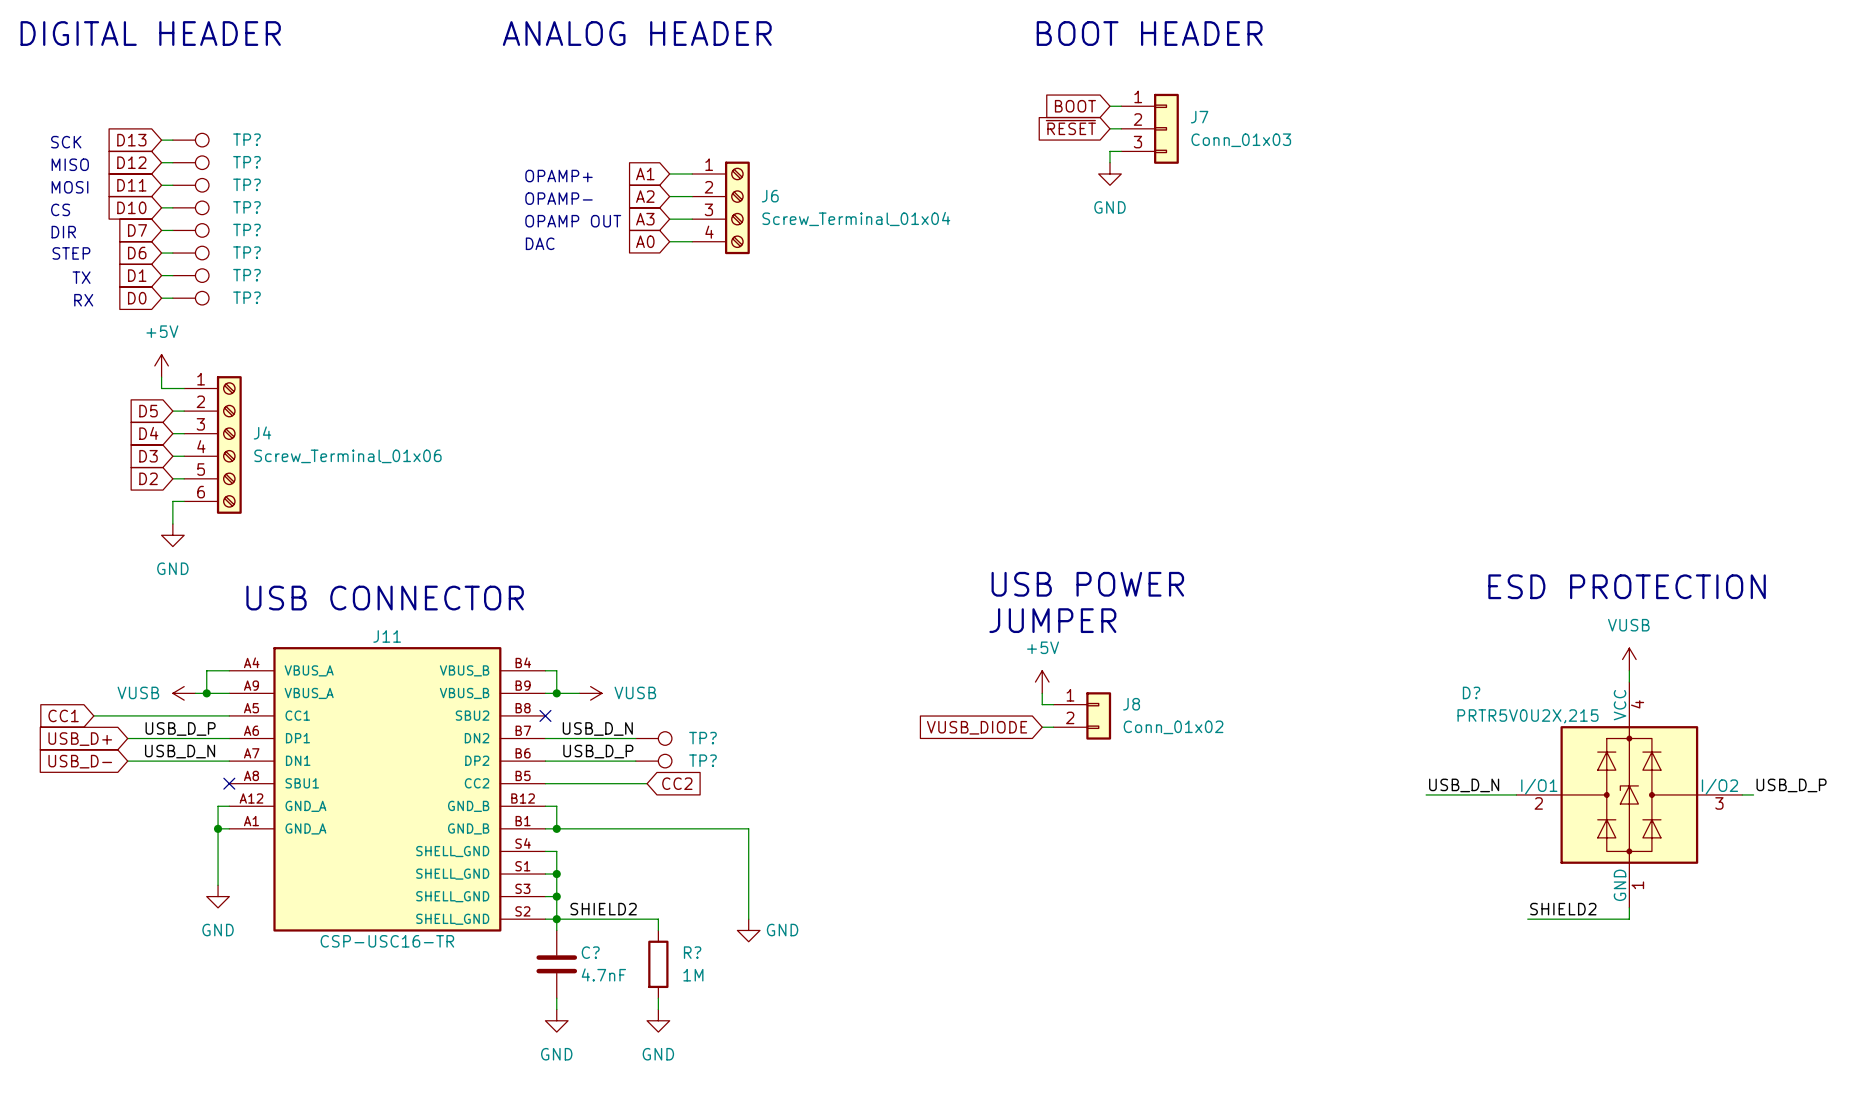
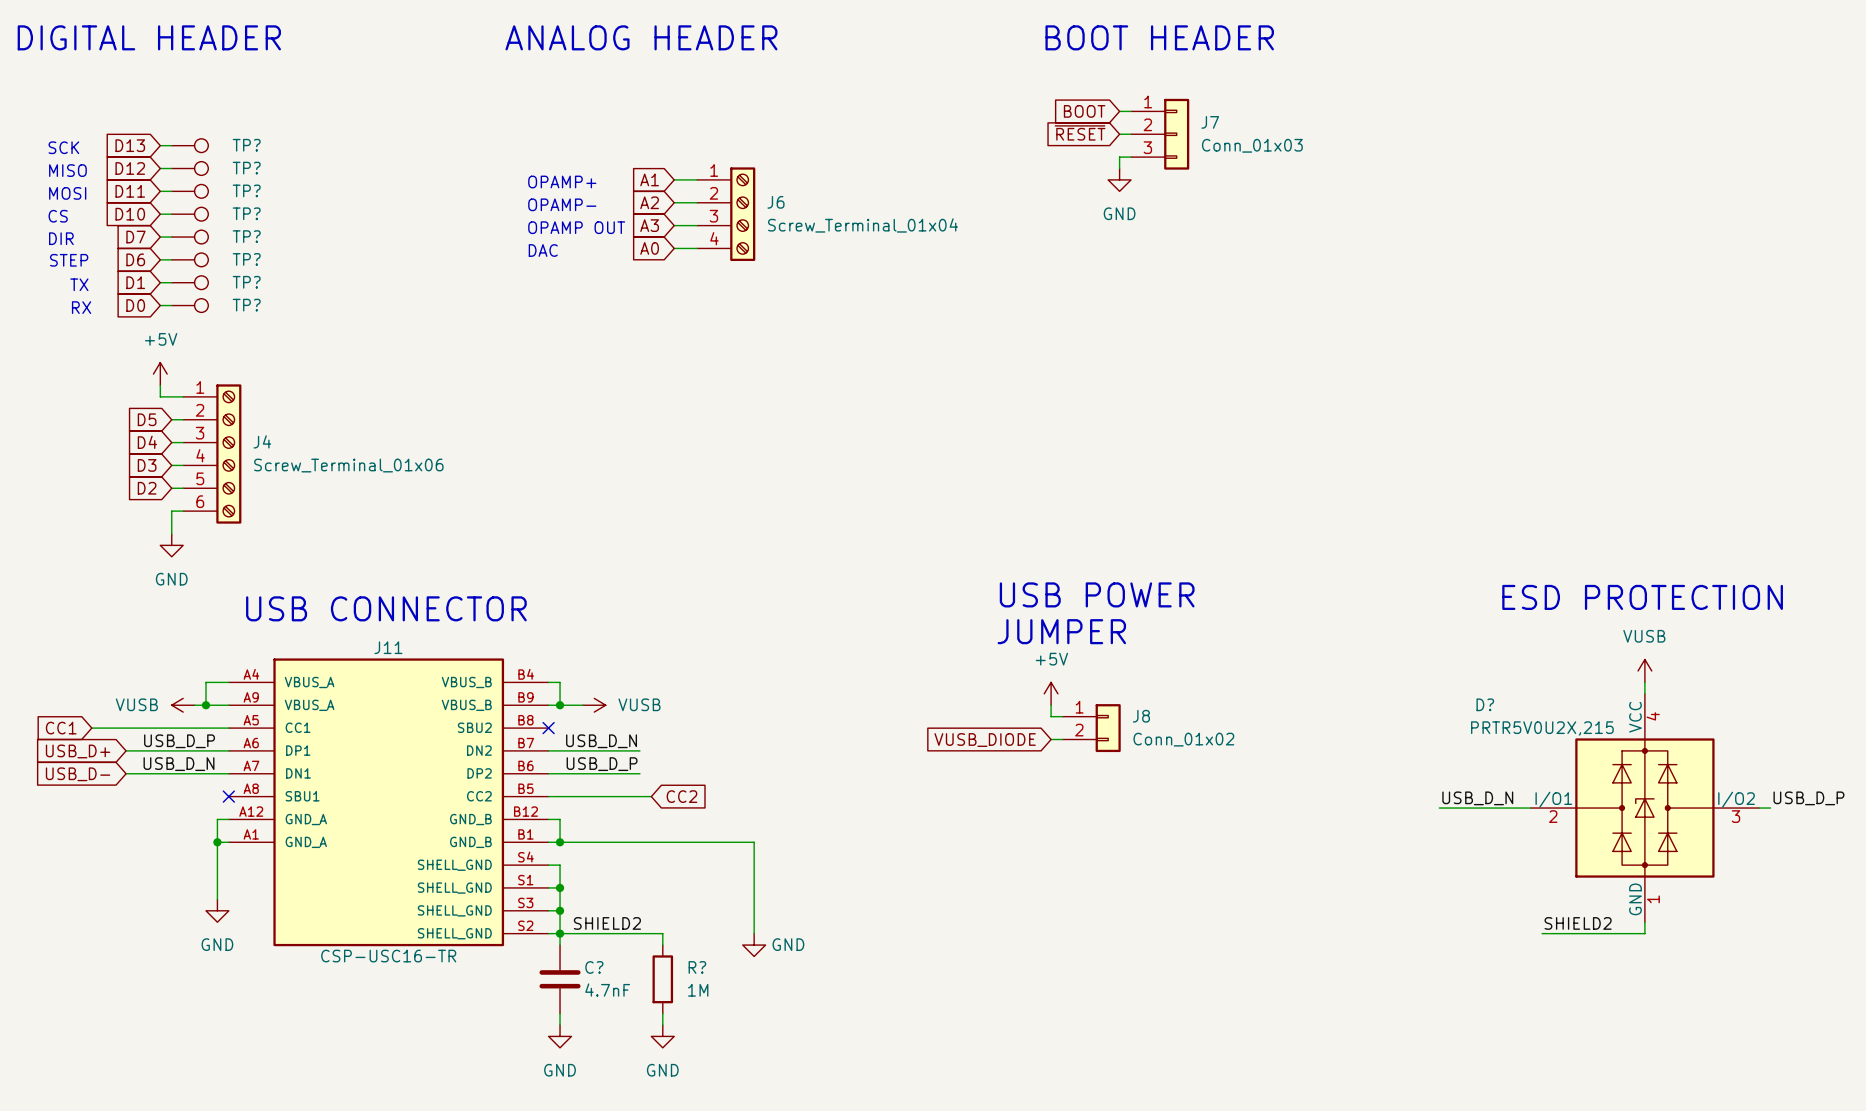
TP?: (653, 738) -> none
TP?: (653, 761) -> none

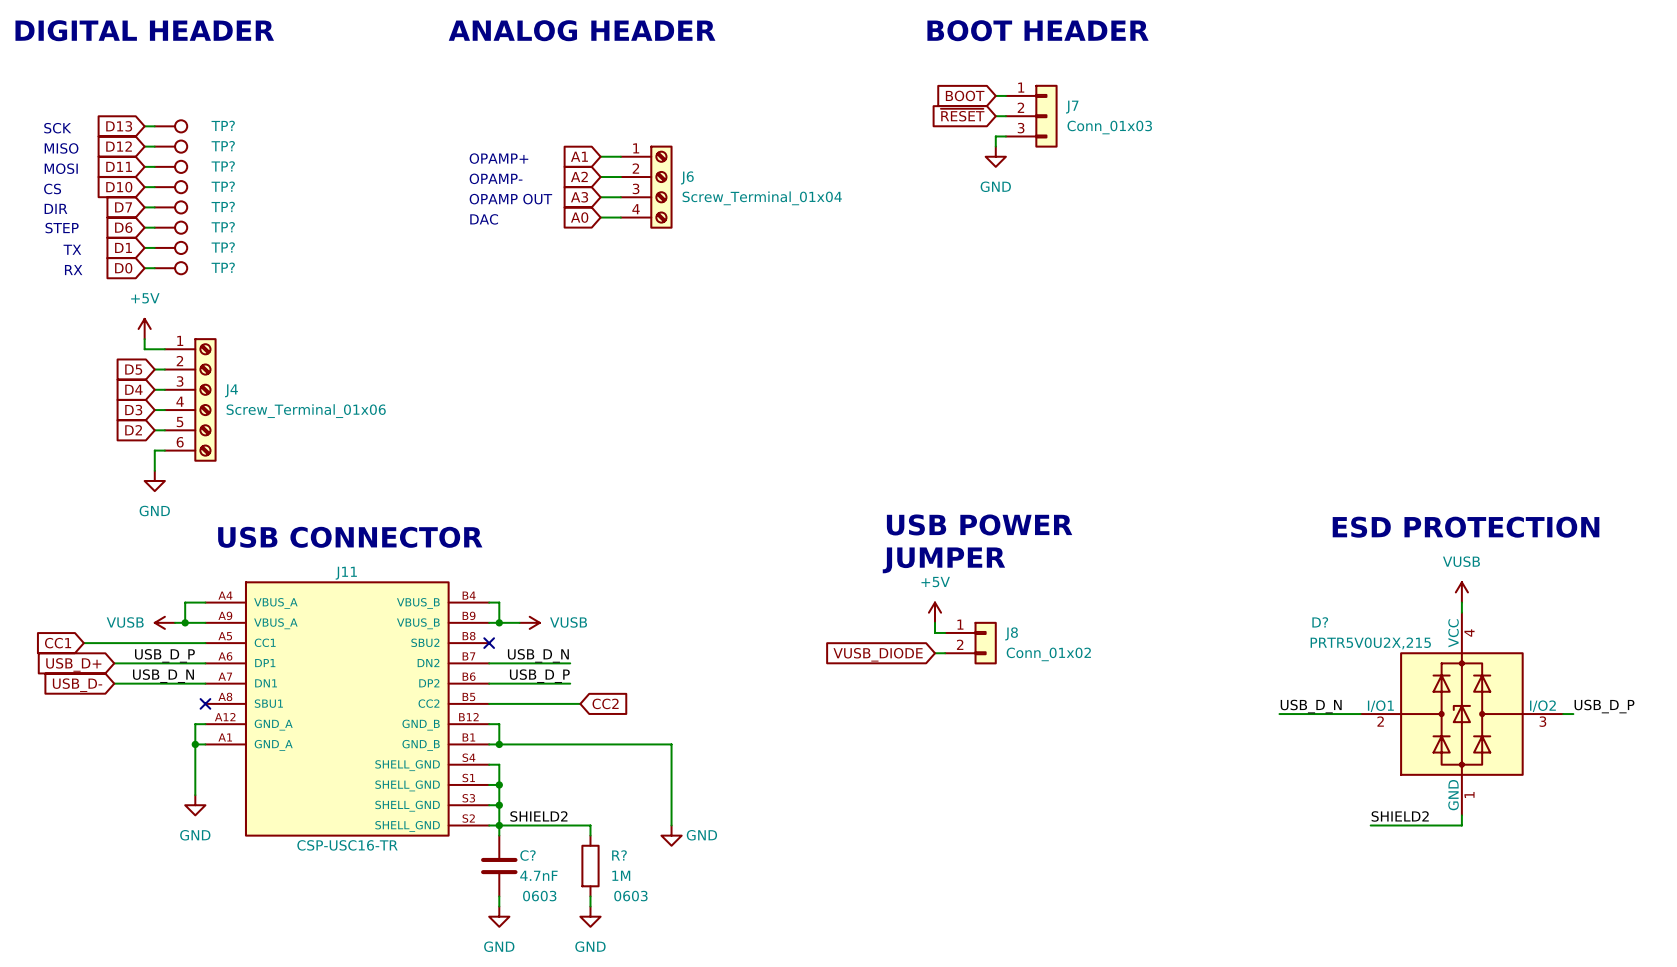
C? text: none -> 0603 (539, 896)
R? text: none -> 0603 (630, 896)

